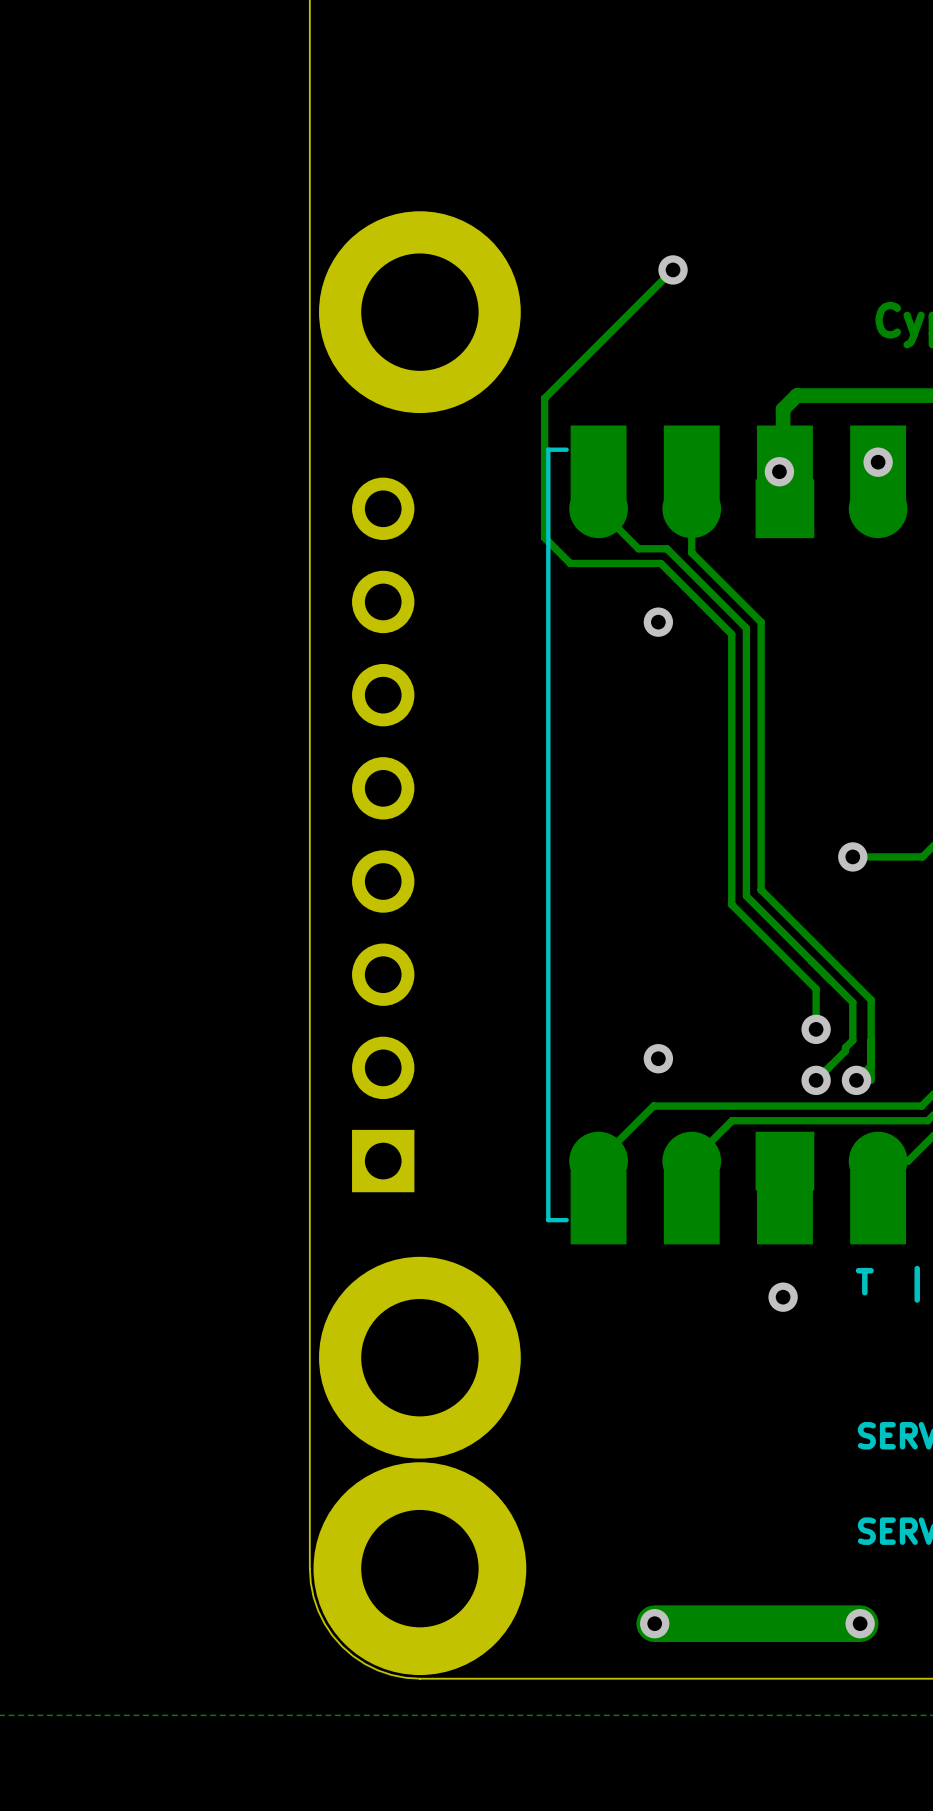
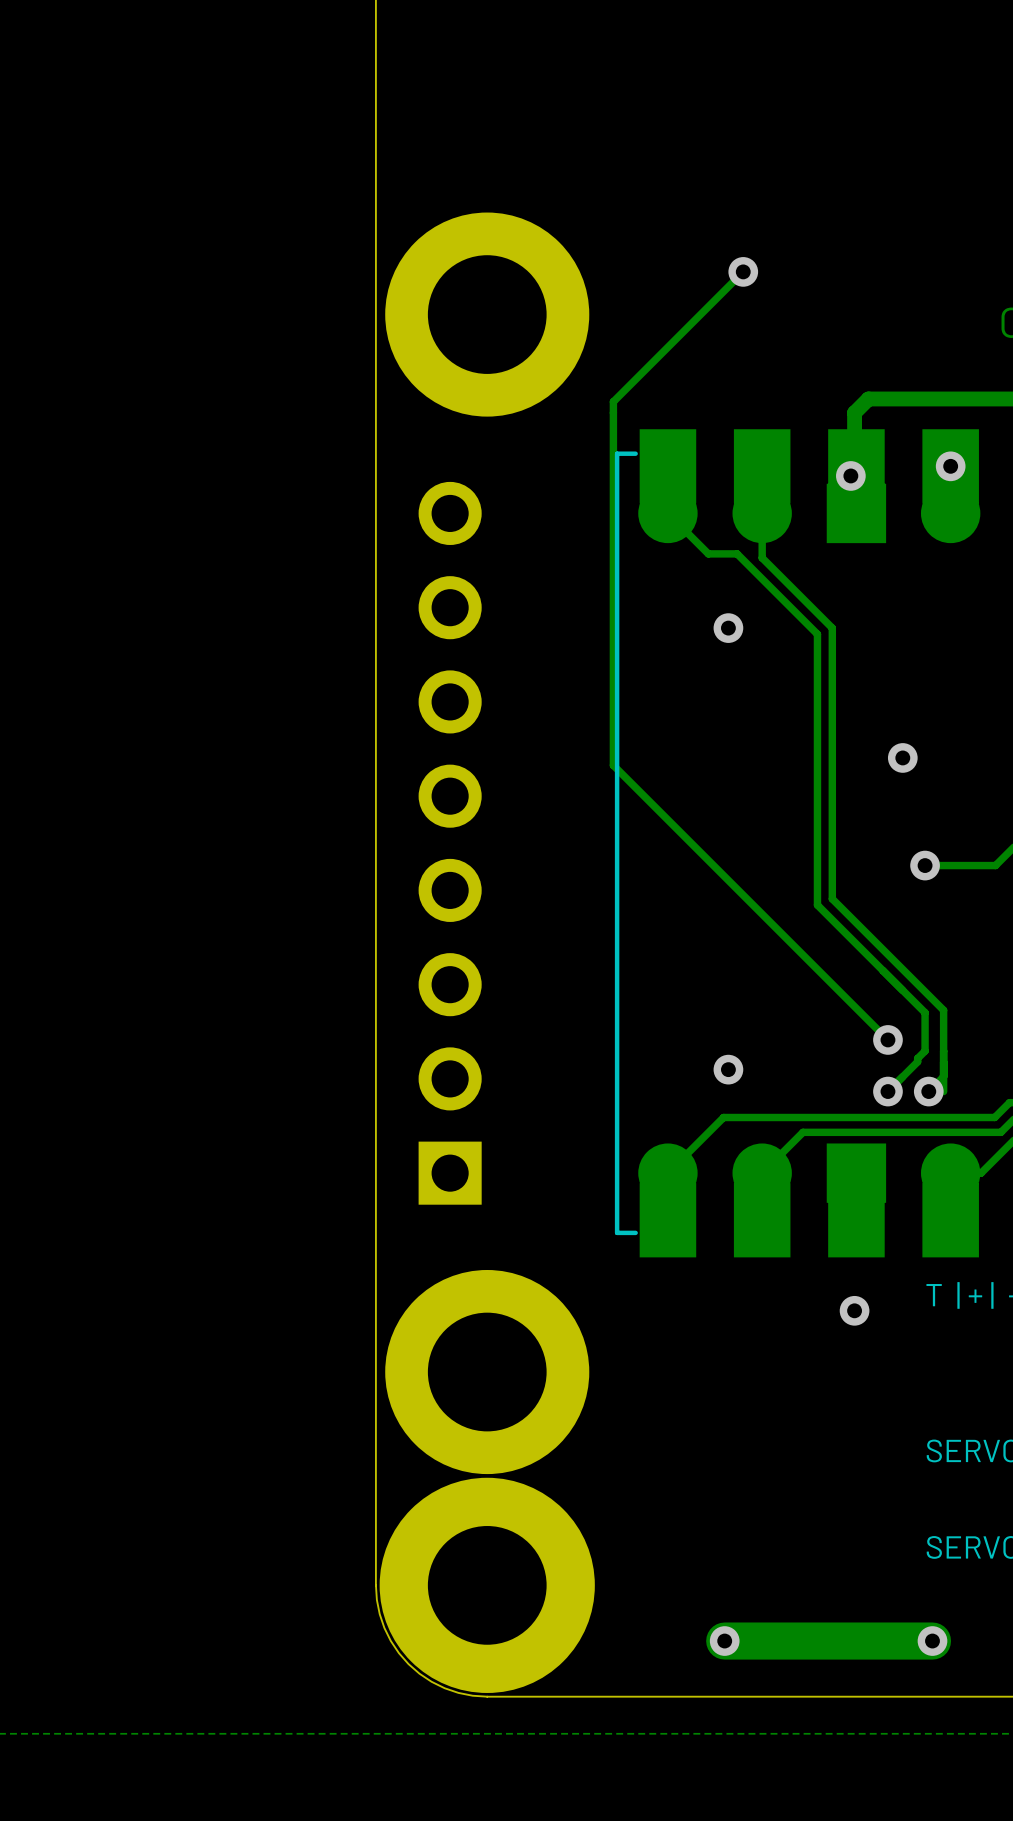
track: (544, 537) (570, 563) (660, 563) (731, 634) (731, 904) (816, 989) (816, 1029) -> (613, 542) (613, 765) (887, 1039)
via: none -> (902, 757)

